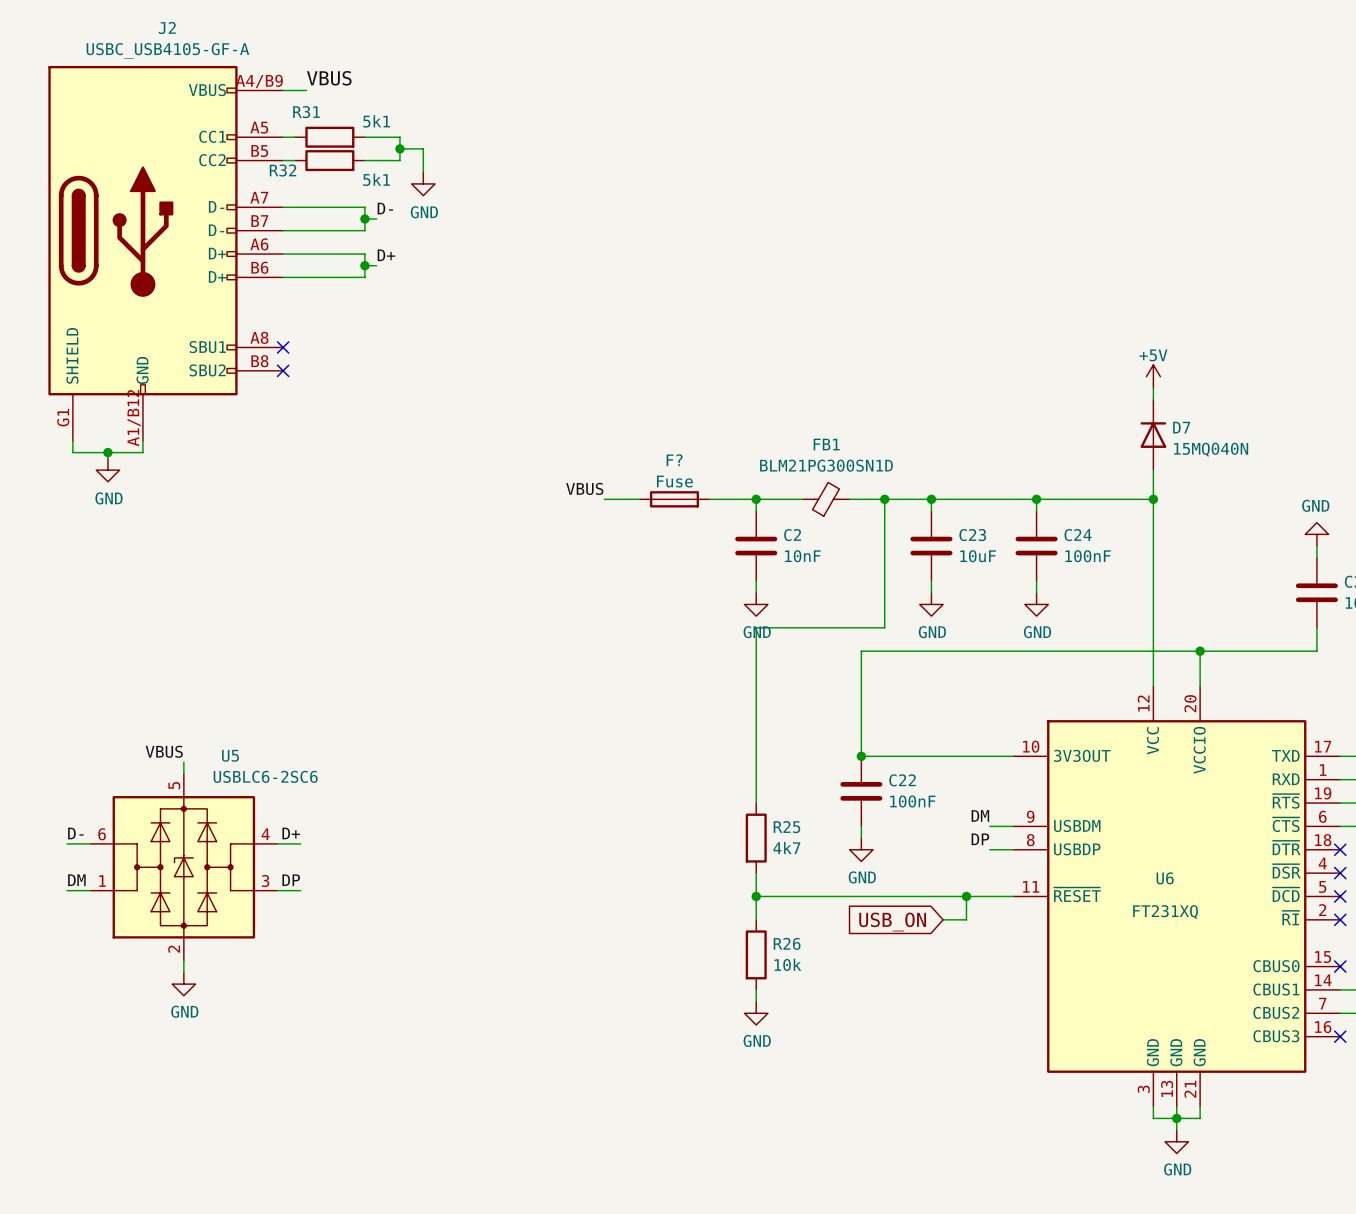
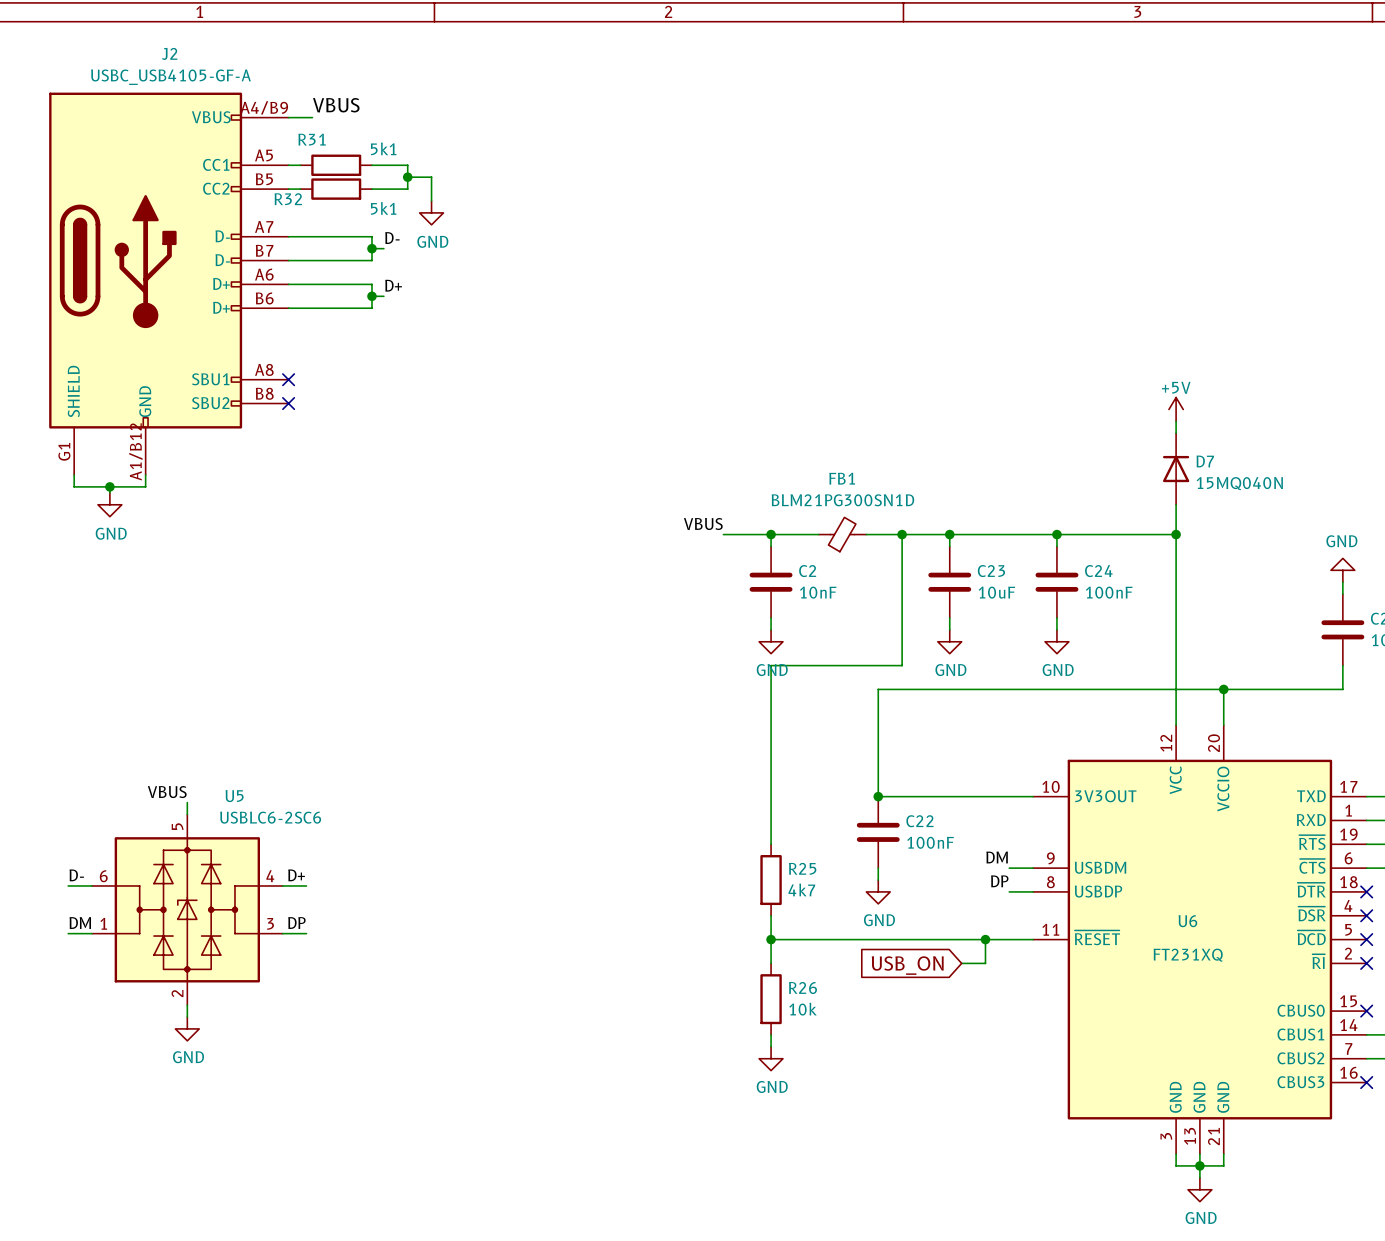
label position: VBUS (584, 488) -> VBUS (703, 524)
wire: (604, 499) (639, 499) -> none
F?: Fuse (674, 499) -> none

